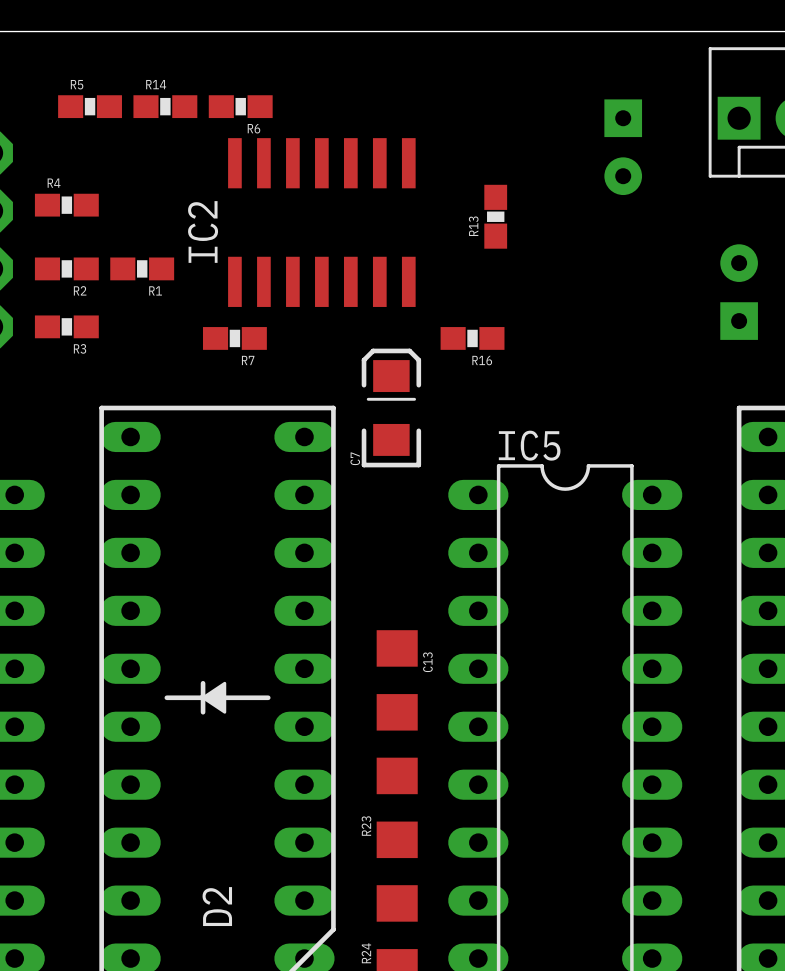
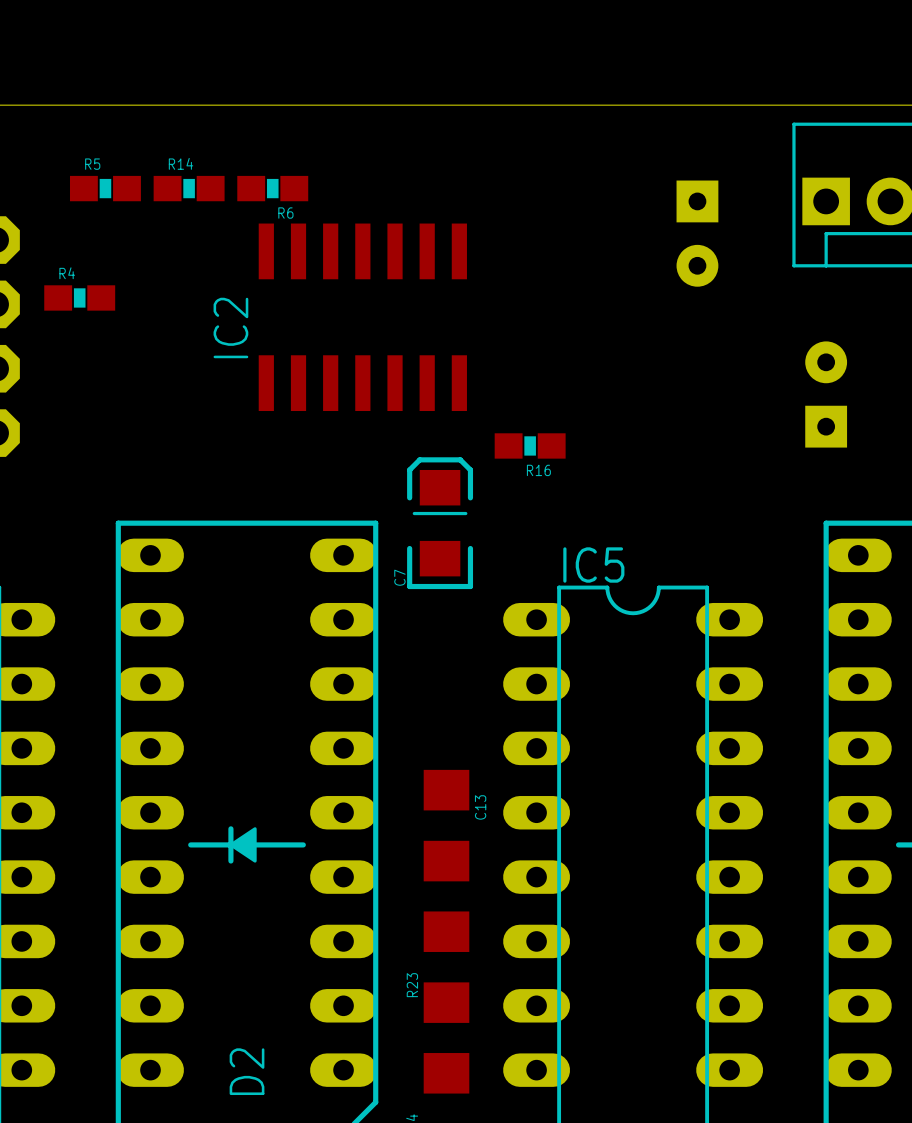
R13: (495, 216) -> none
R2: (66, 268) -> none
R1: (142, 268) -> none
R3: (66, 326) -> none
R7: (234, 338) -> none

